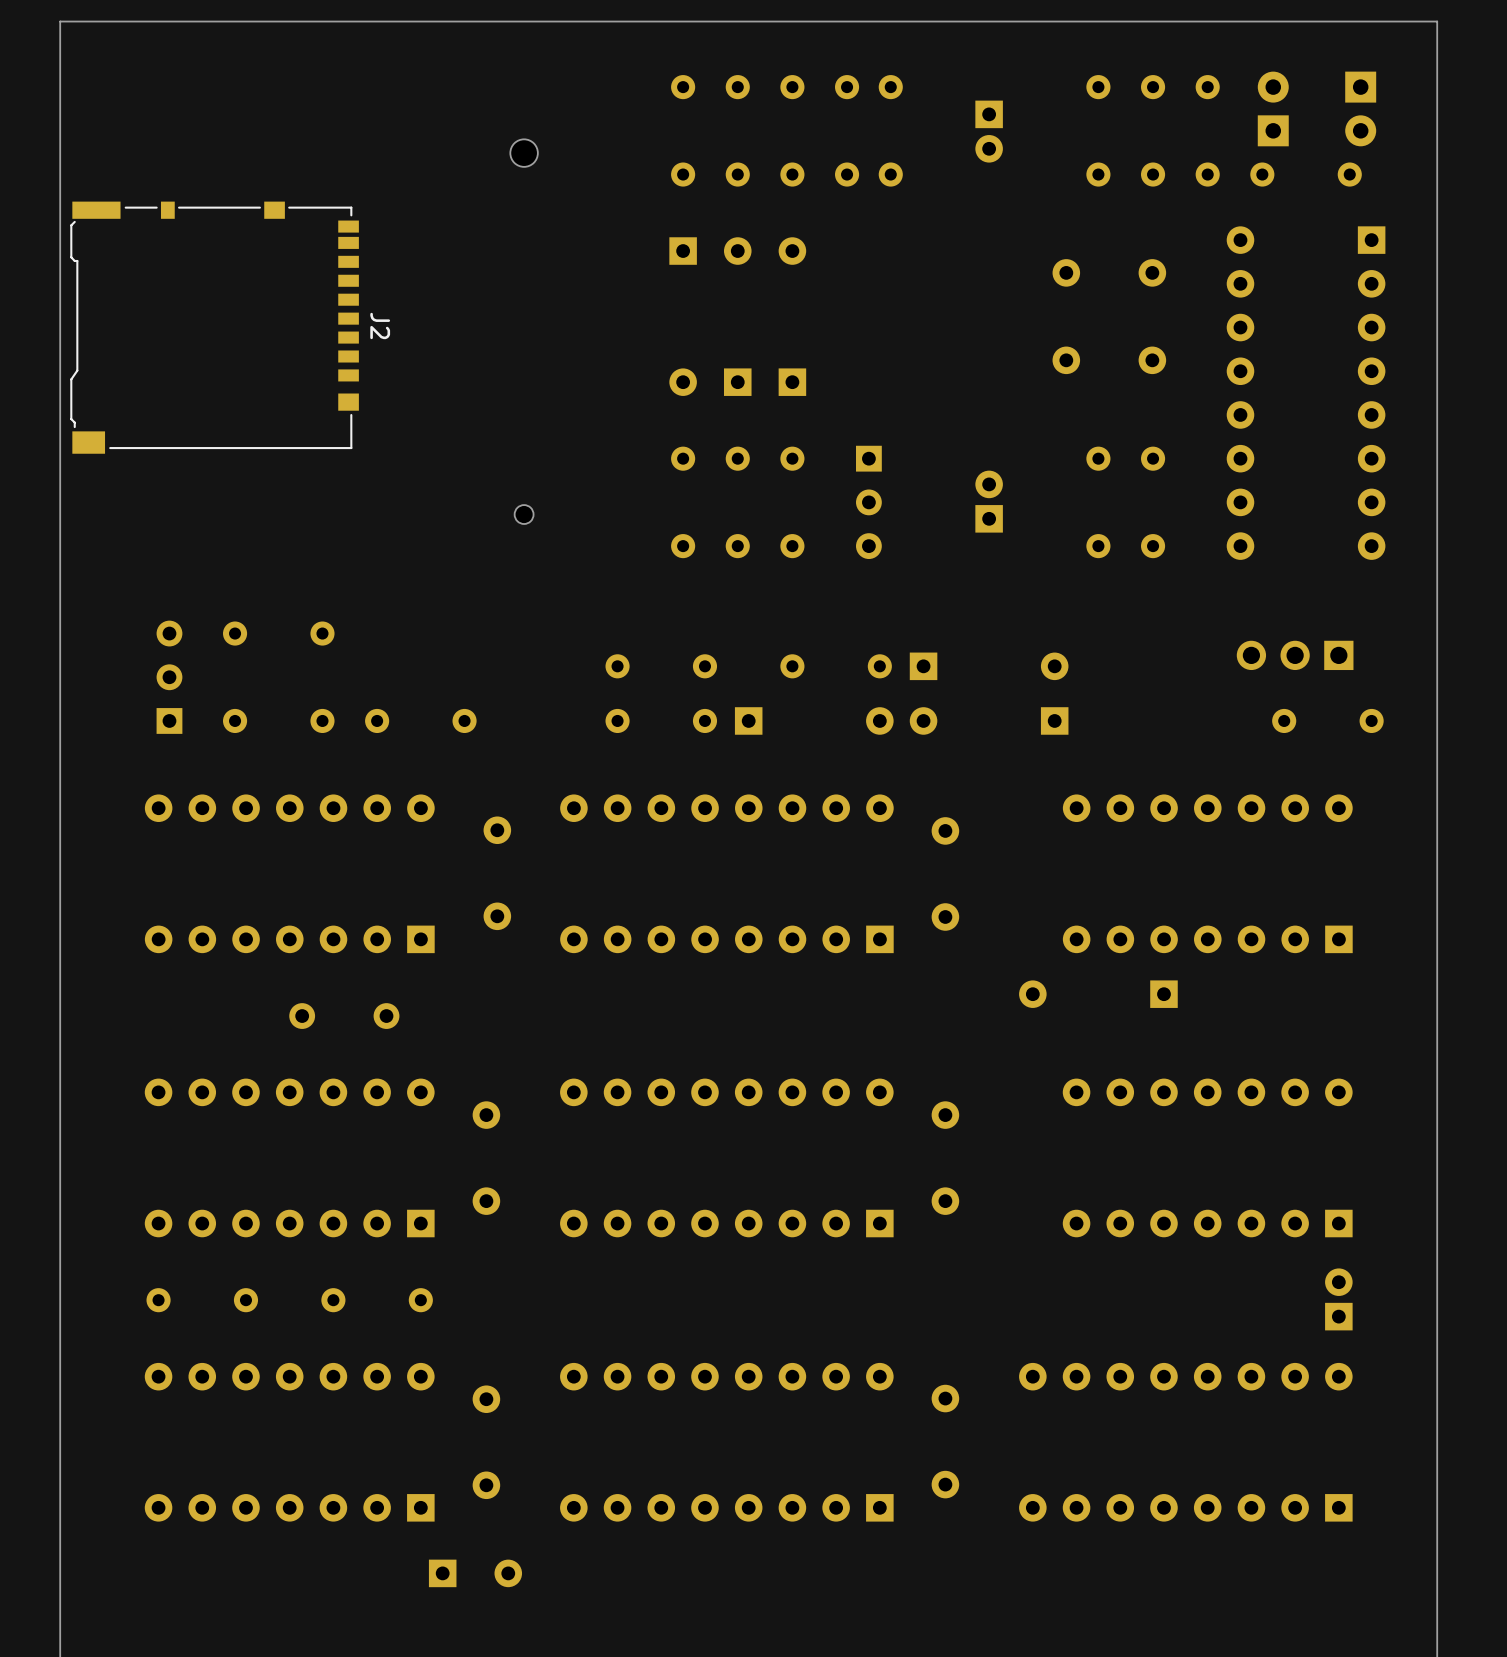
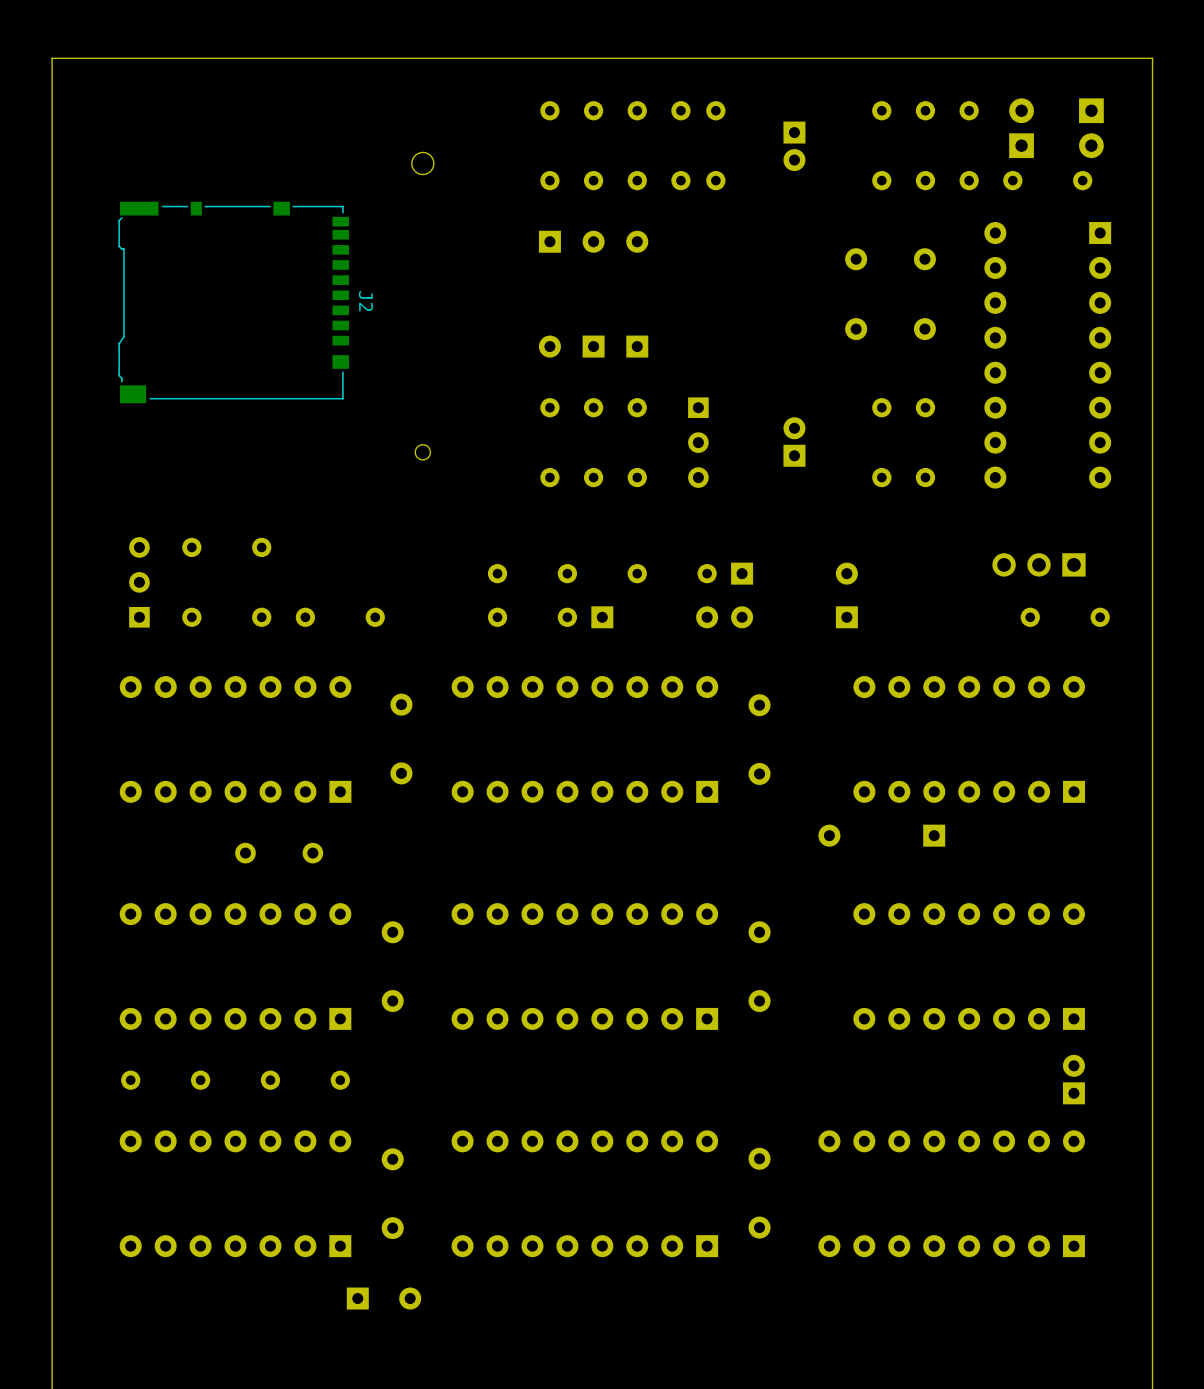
J2 position: (214, 327) -> (233, 302)

